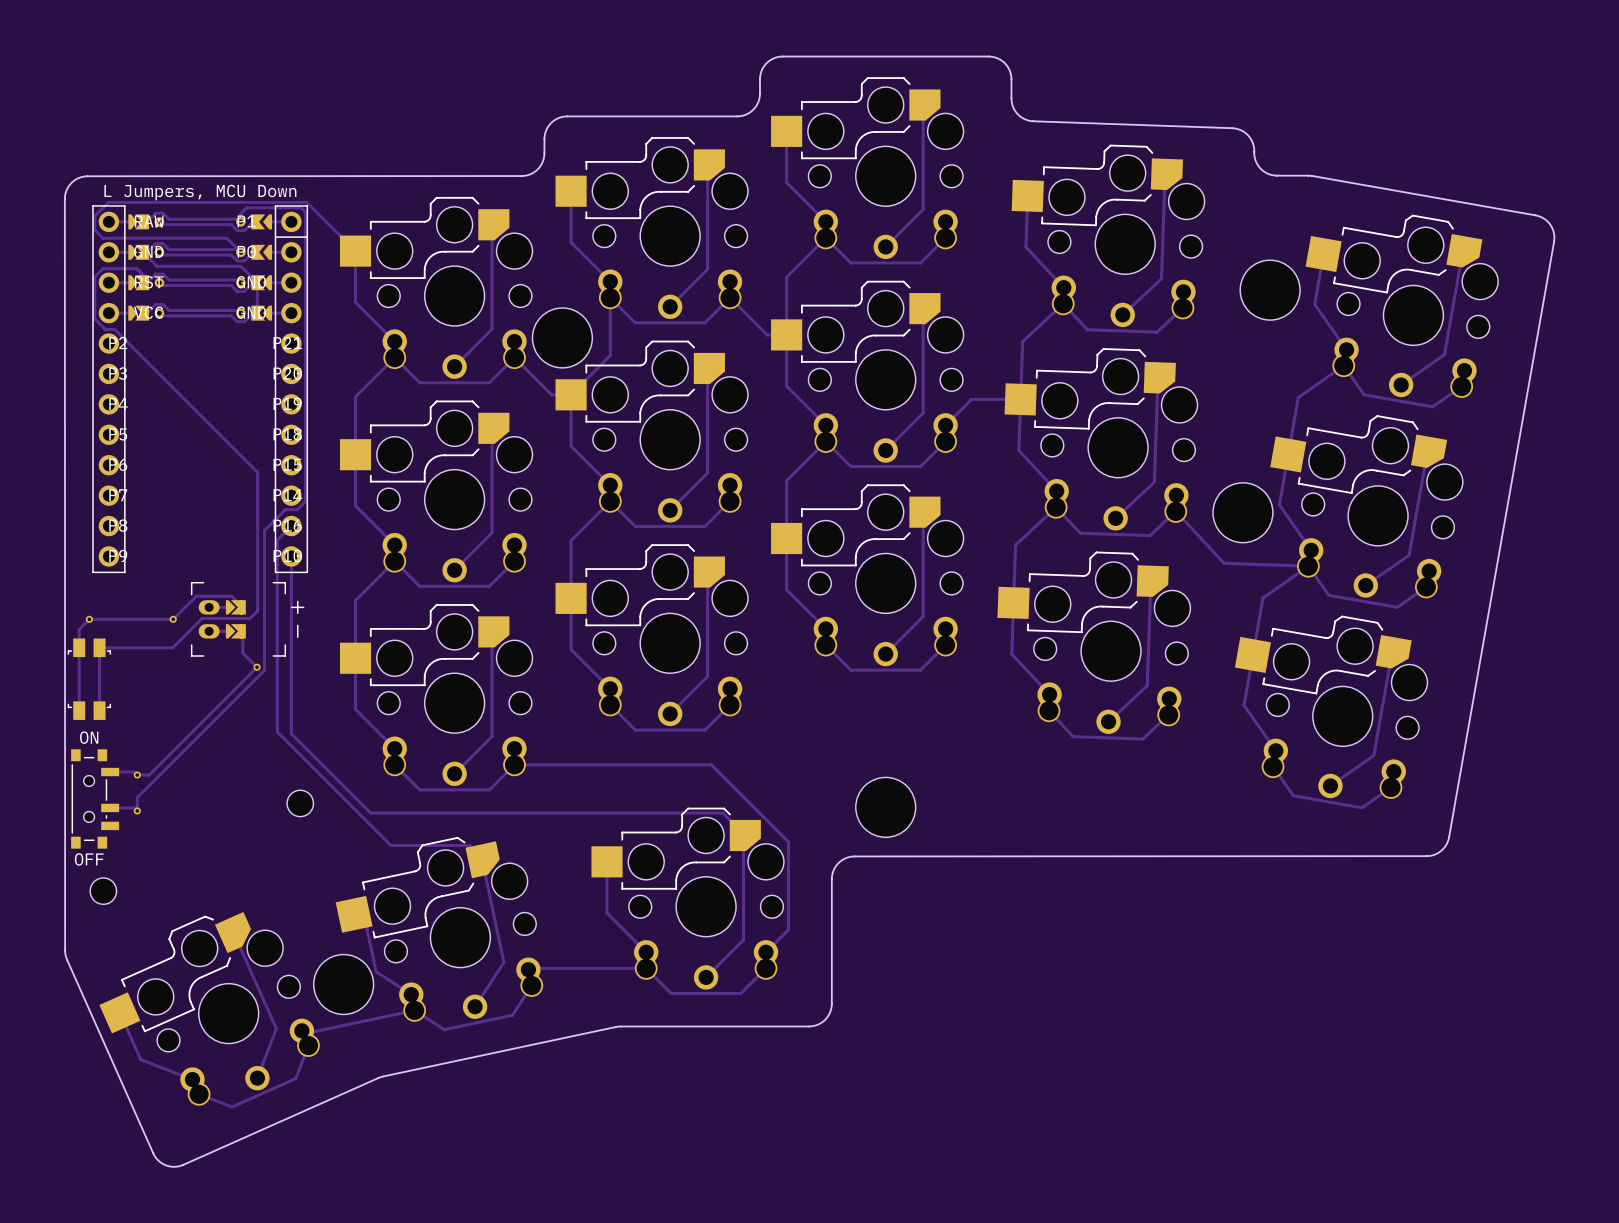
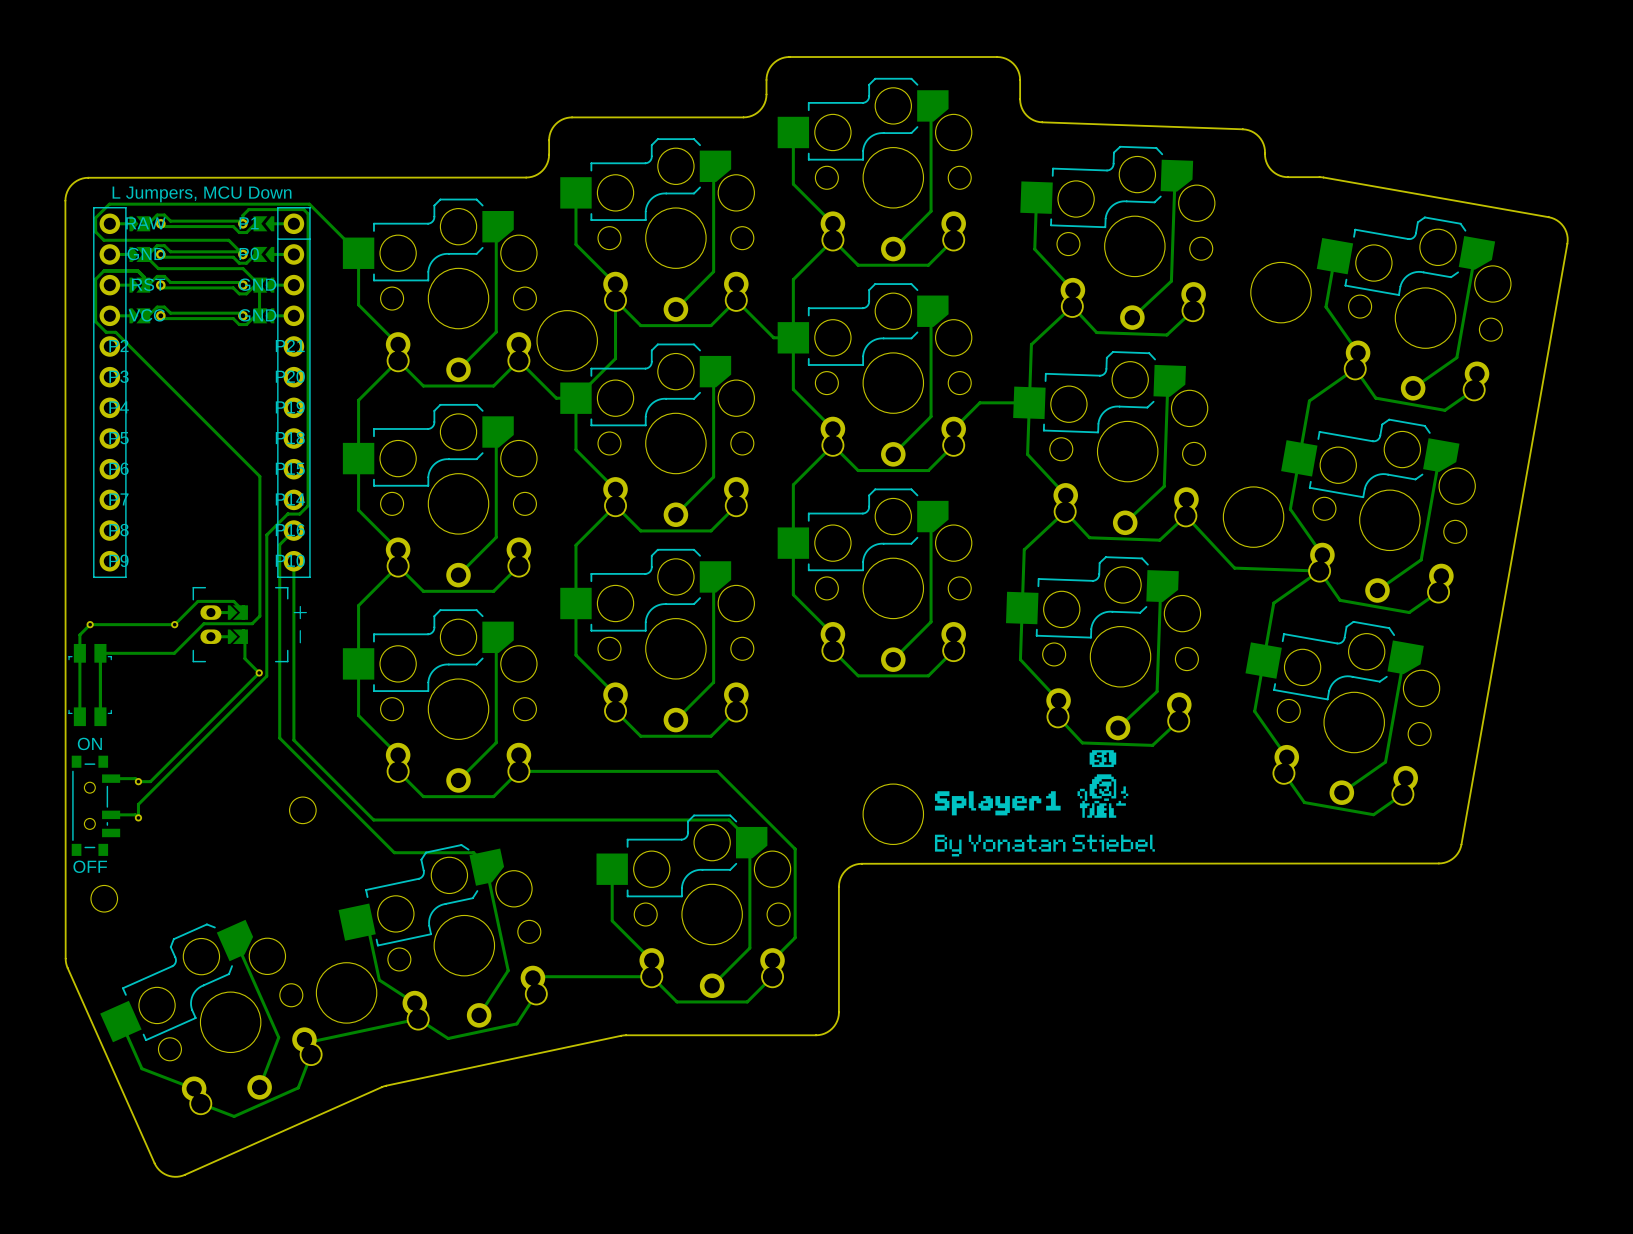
drawing: none -> [934, 750, 1155, 857]

